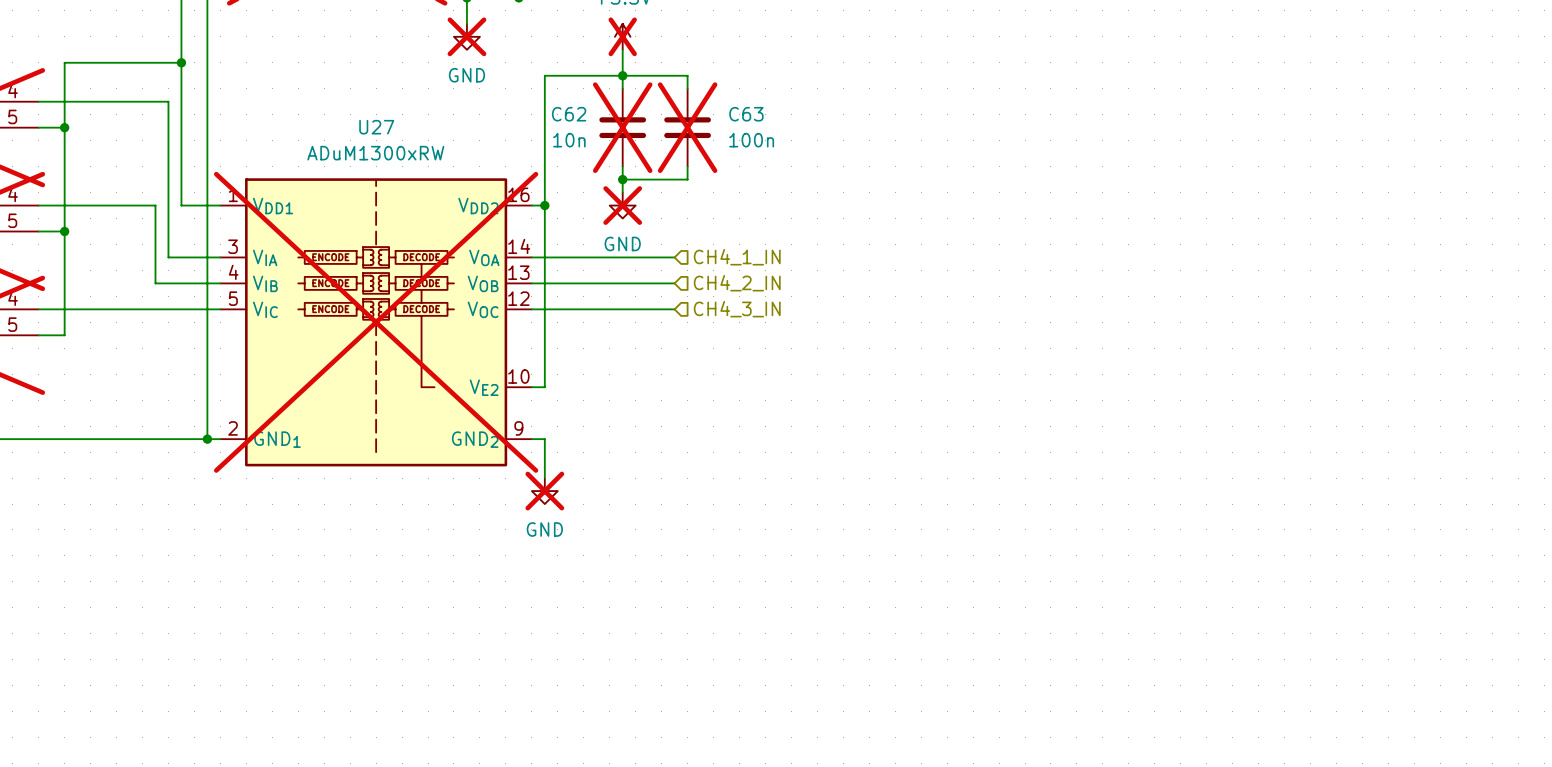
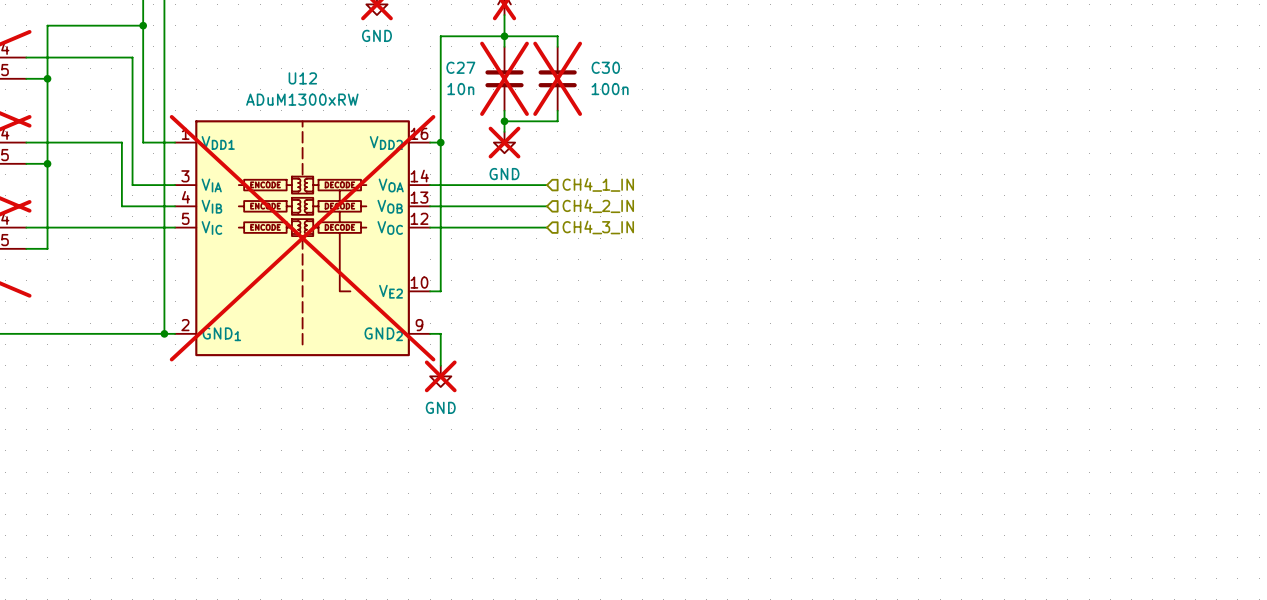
C62 name: C62 (569, 114) -> C27 (460, 67)
C63 name: C63 (746, 114) -> C30 (605, 67)
U27 name: U27 (376, 127) -> U12 (302, 78)

